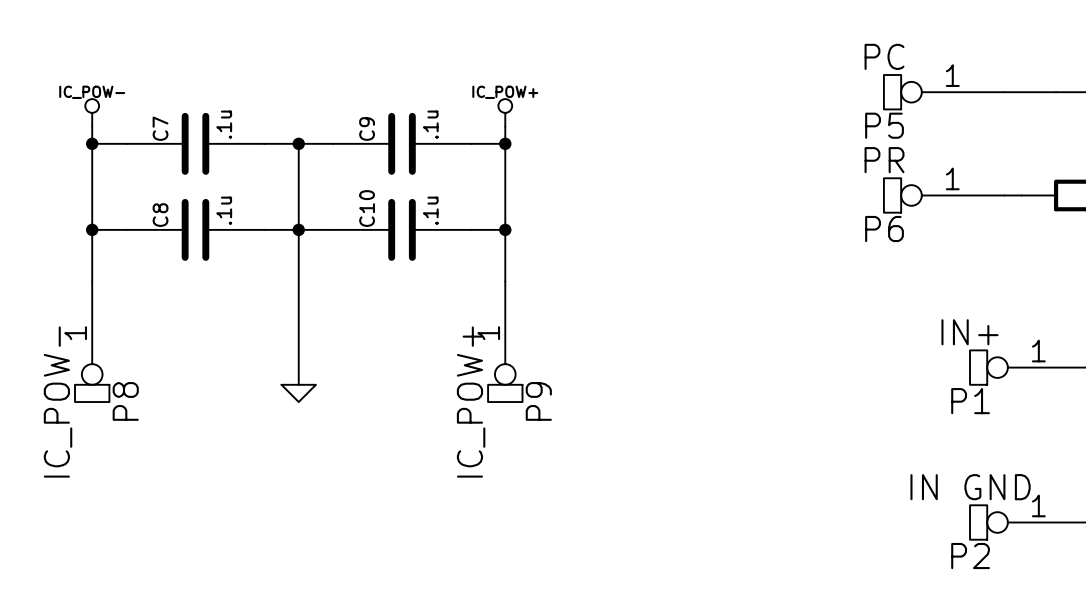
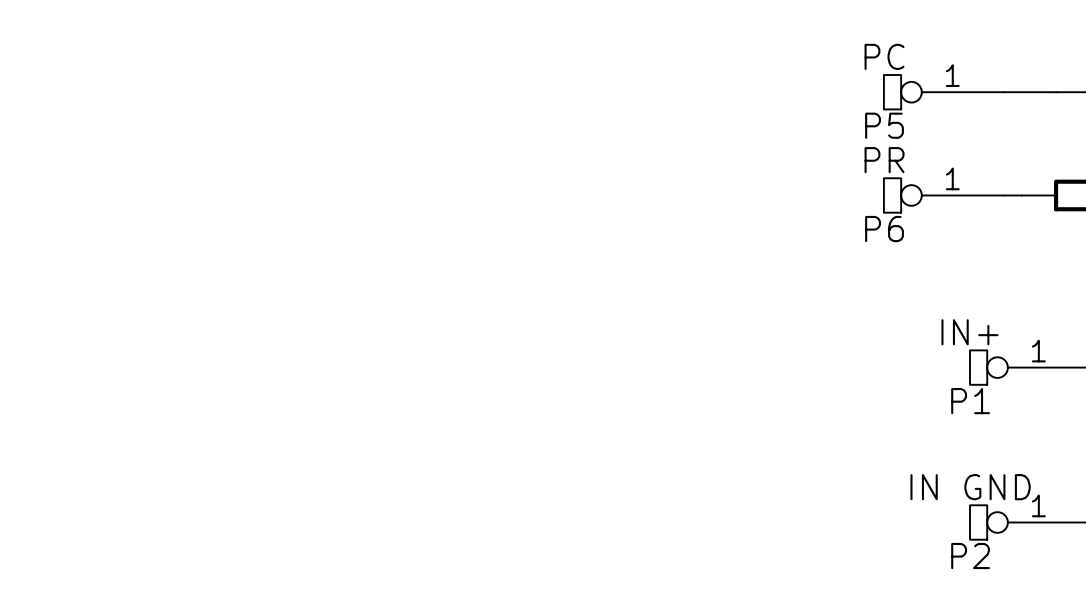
power symbol: IC_POW- (92, 112) -> none
power symbol: IC_POW+ (505, 112) -> none
wire: (92, 126) (92, 281) -> none
wire: (505, 126) (505, 281) -> none
wire: (92, 143) (126, 143) -> none
junction: (92, 143) -> none
C7: .1u (195, 143) -> none
wire: (264, 143) (333, 143) -> none
wire: (298, 143) (298, 384) -> none
junction: (298, 143) -> none
C9: .1u (402, 143) -> none
wire: (470, 143) (505, 143) -> none
junction: (505, 143) -> none
wire: (92, 229) (126, 229) -> none
junction: (92, 229) -> none
C8: .1u (195, 229) -> none
wire: (264, 229) (333, 229) -> none
junction: (298, 229) -> none
C10: .1u (402, 229) -> none
wire: (470, 229) (505, 229) -> none
junction: (505, 229) -> none
P8: IC_POW- (92, 341) -> none
P9: IC_POW+ (505, 341) -> none
power symbol: (298, 393) -> none

